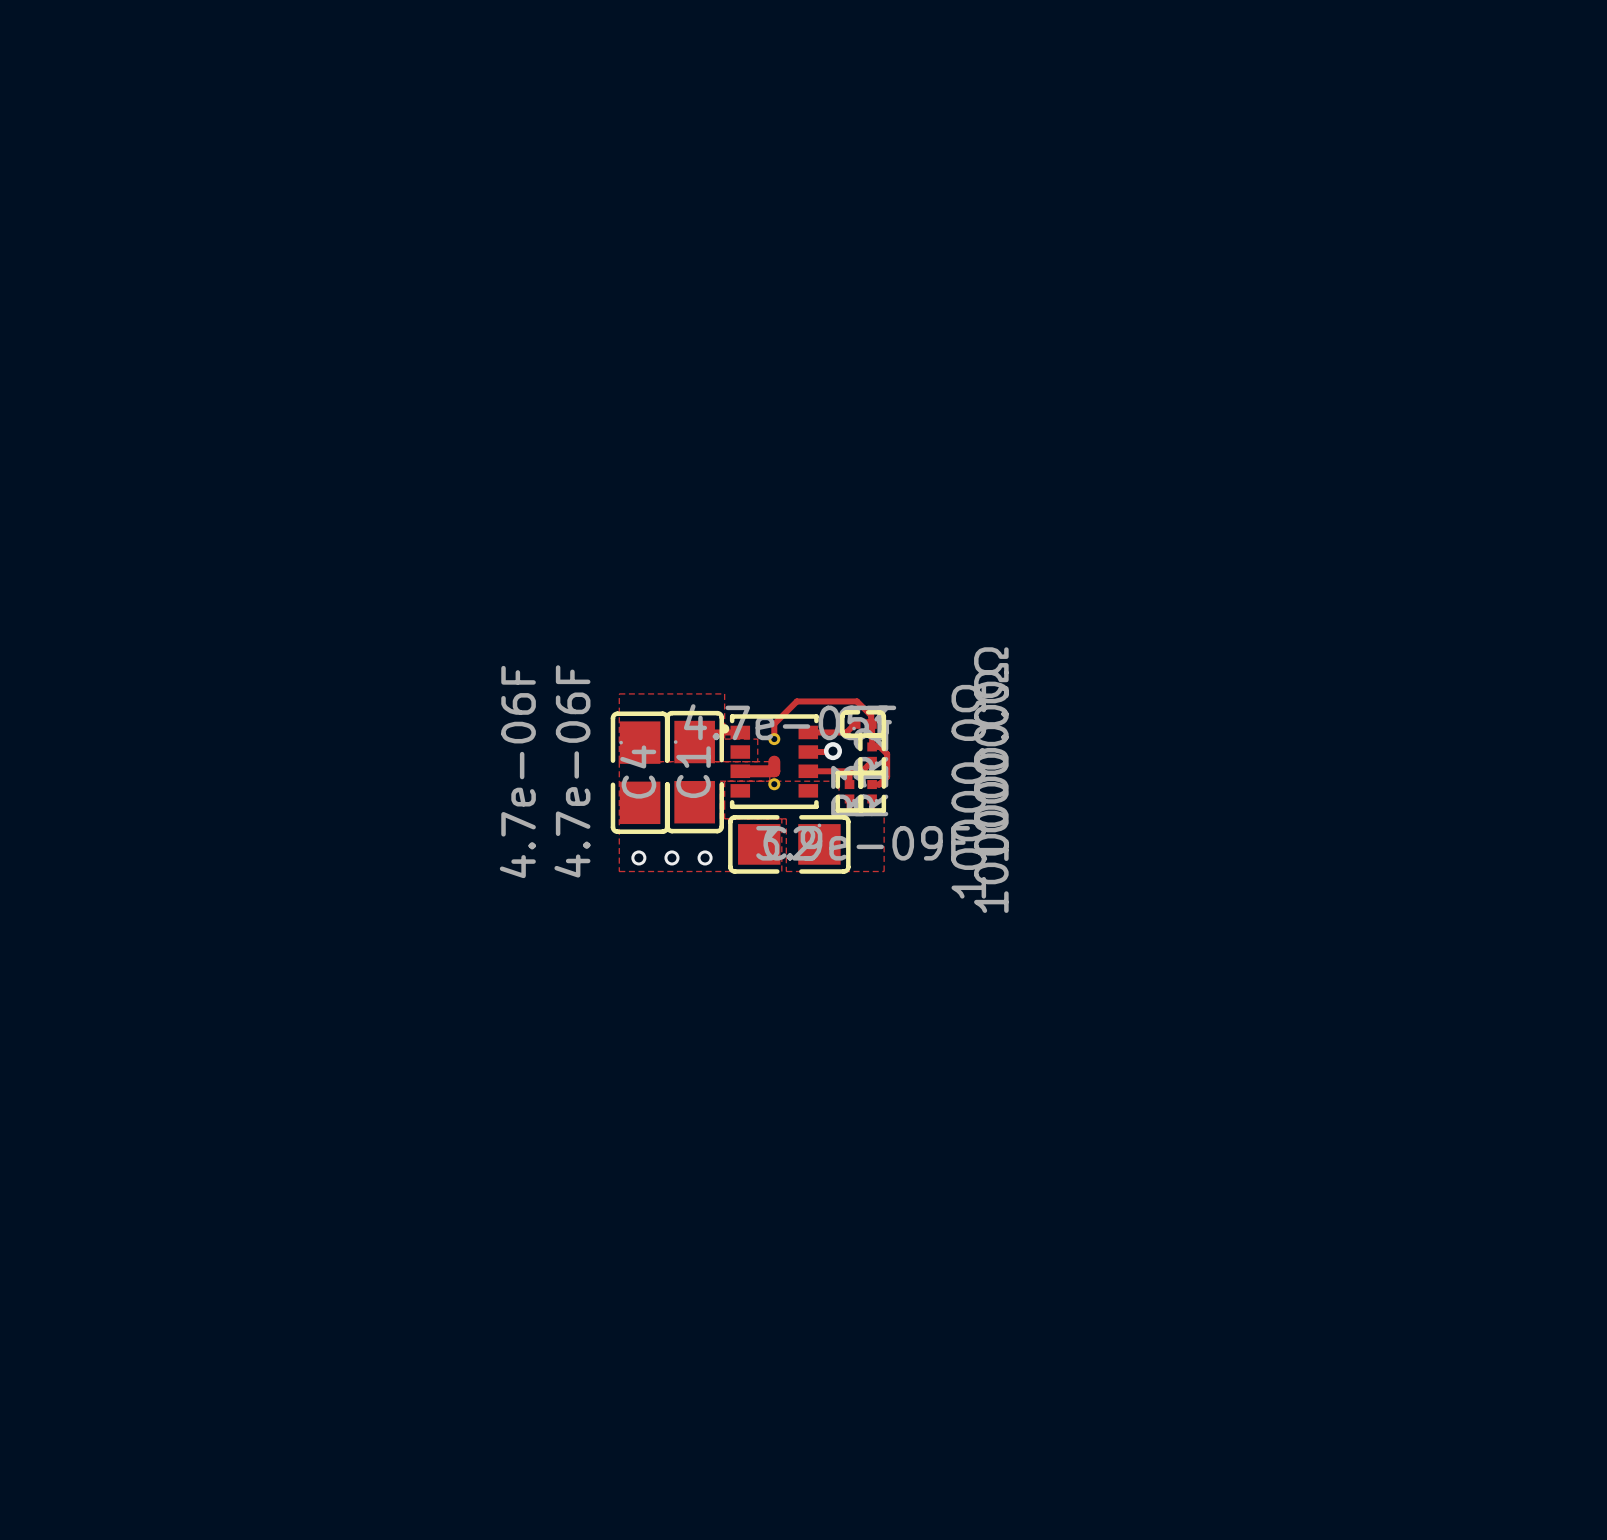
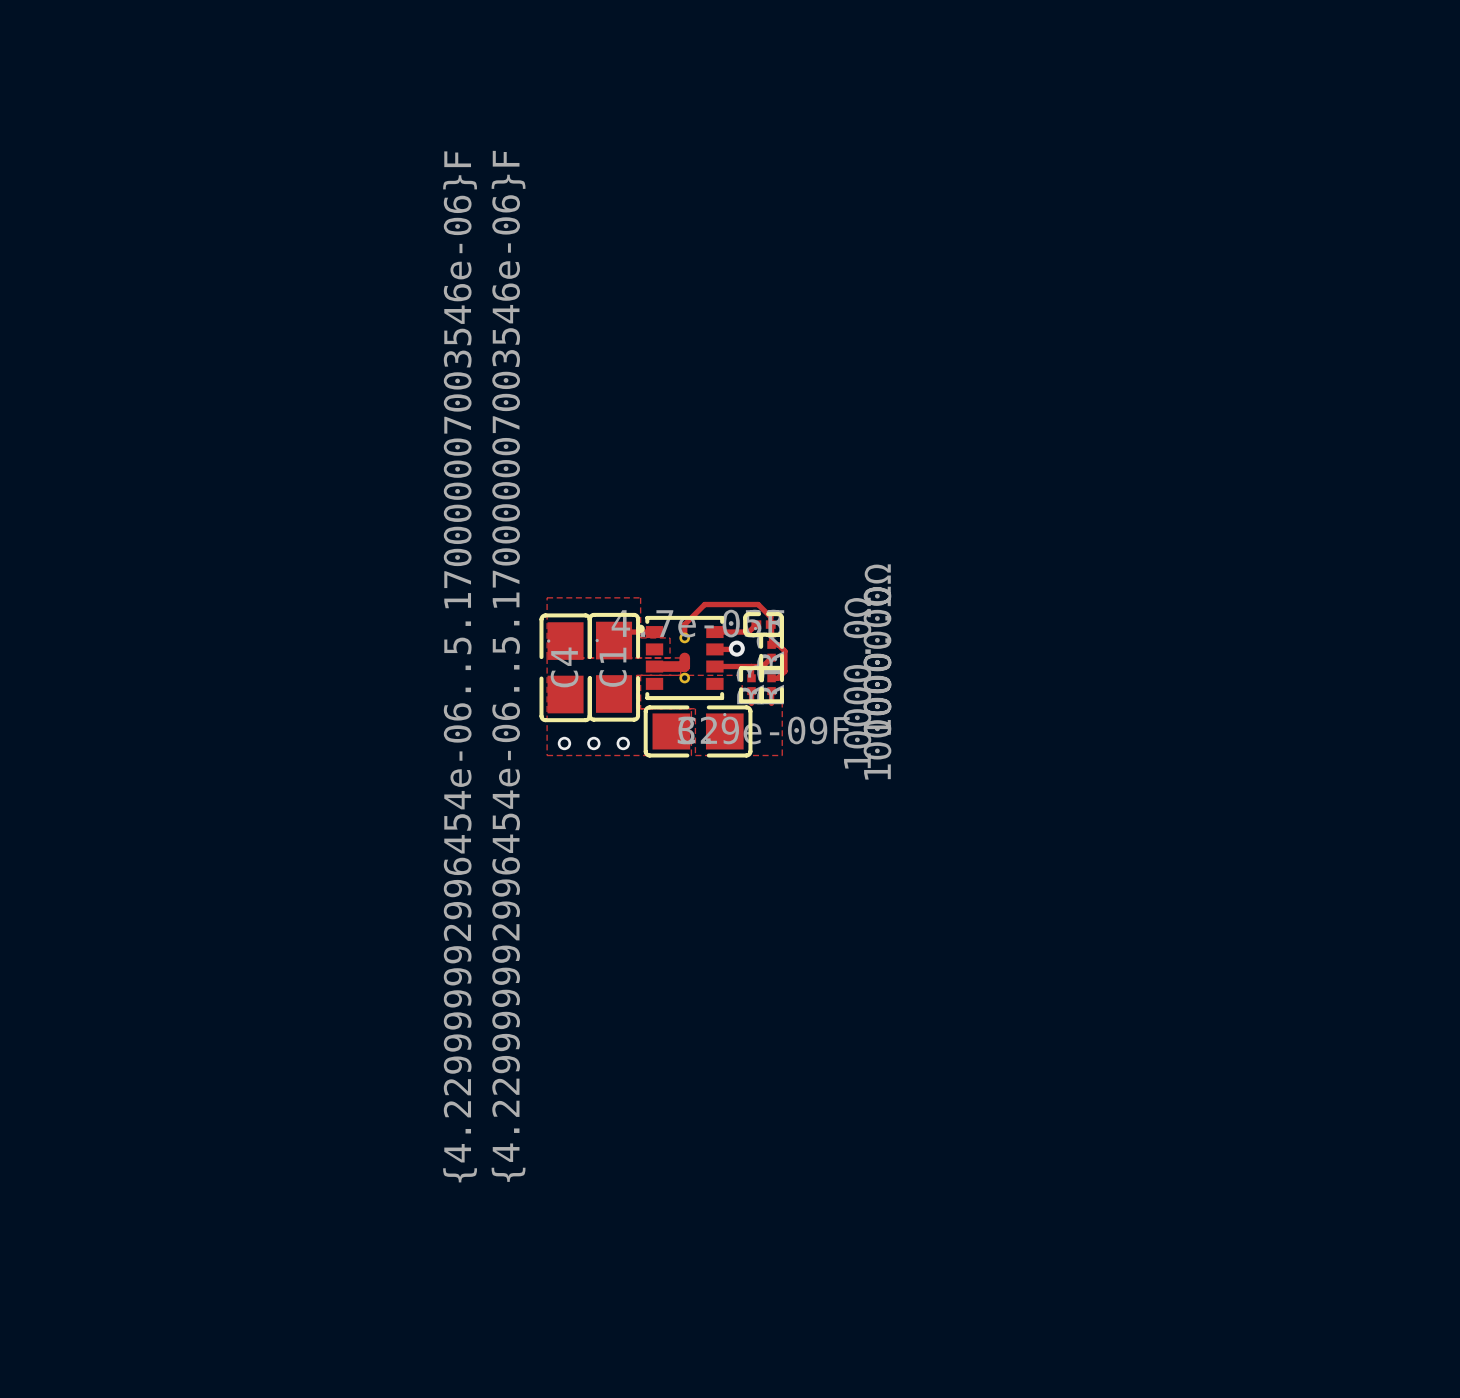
C1 value: 4.7e-06F (572, 771) -> {4.229999992996454e-06..5.170000007003546e-06}F (508, 666)
C4 value: 4.7e-06F (517, 772) -> {4.229999992996454e-06..5.170000007003546e-06}F (460, 666)

